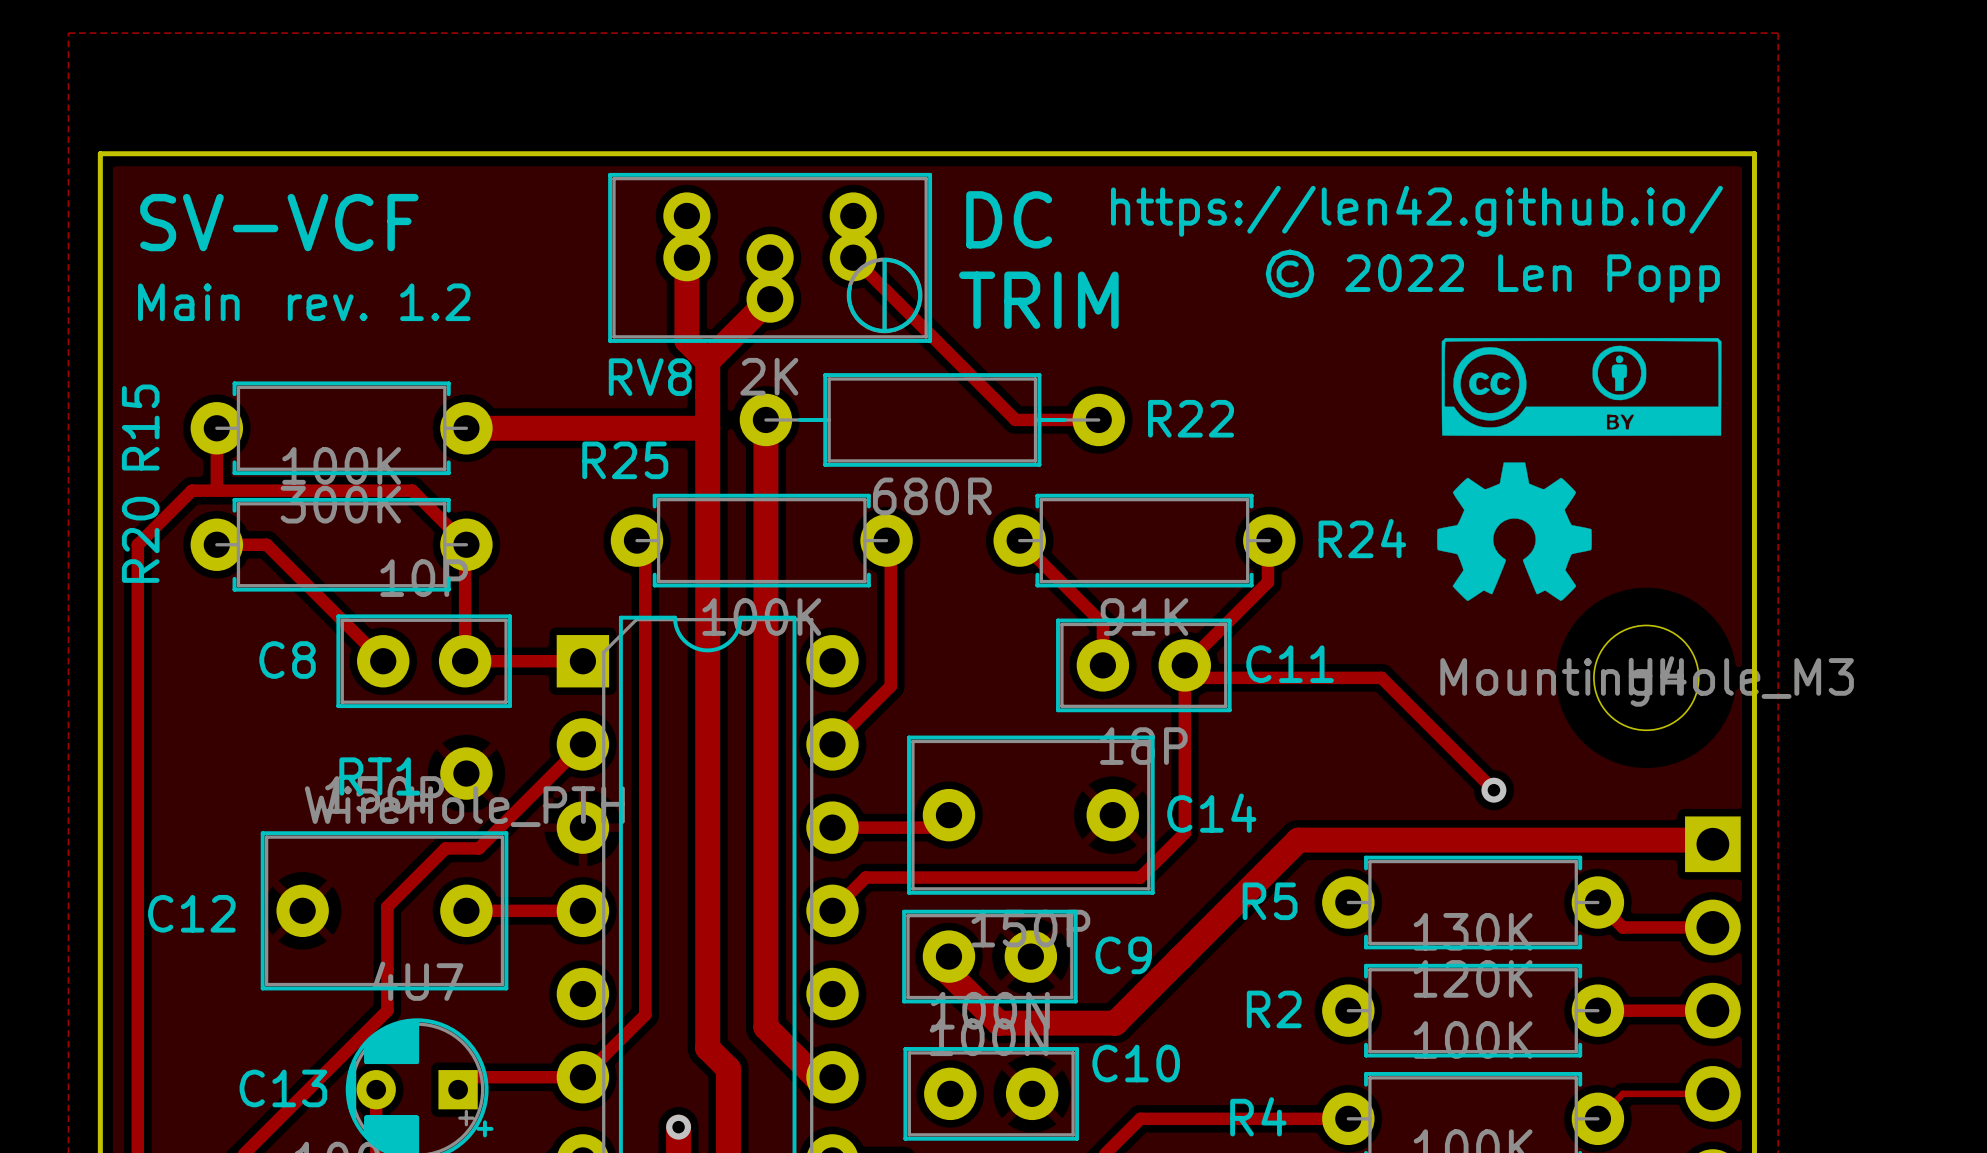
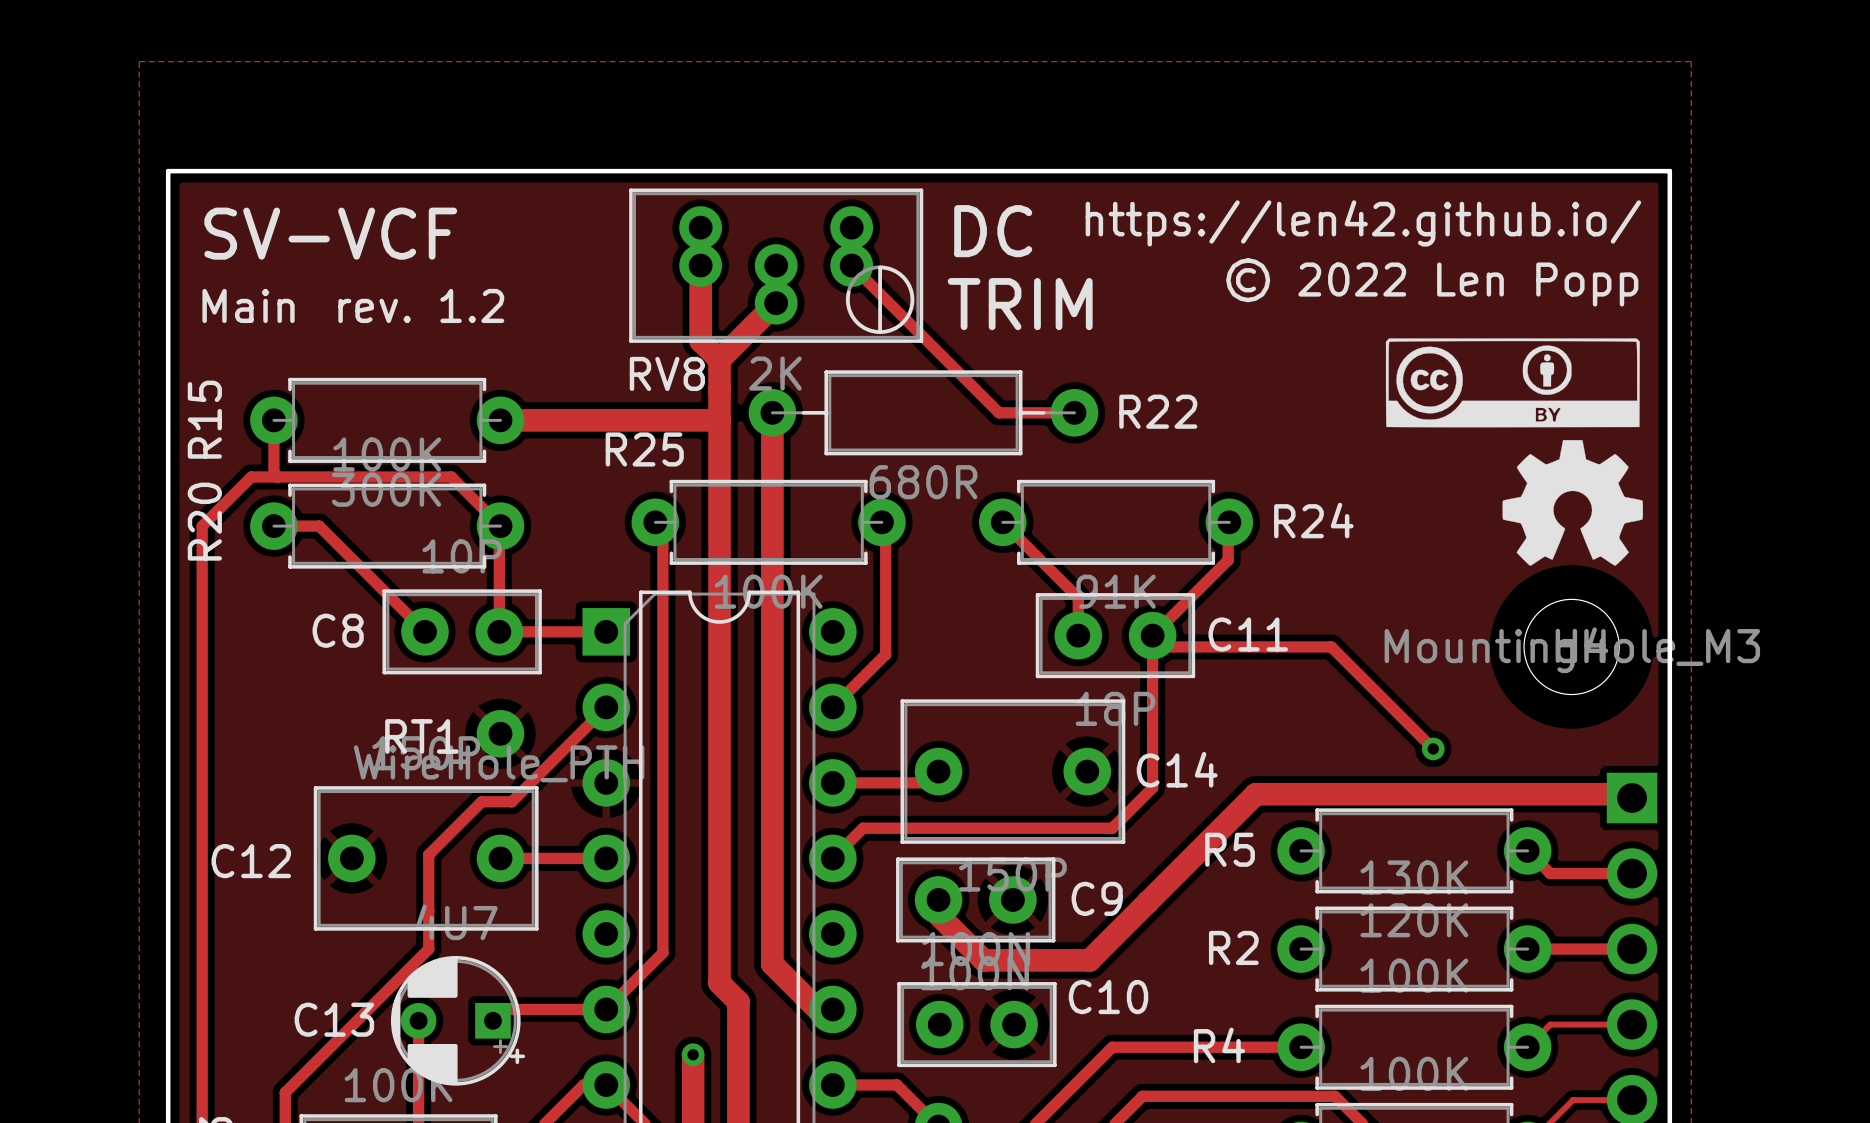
drawing position: (1514, 531) -> (1572, 502)

